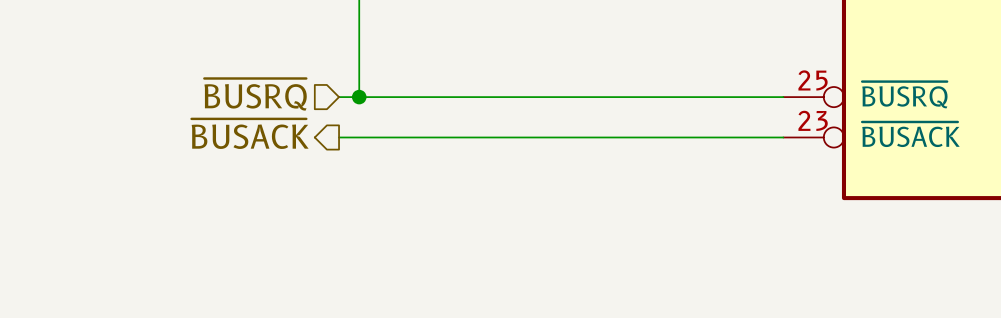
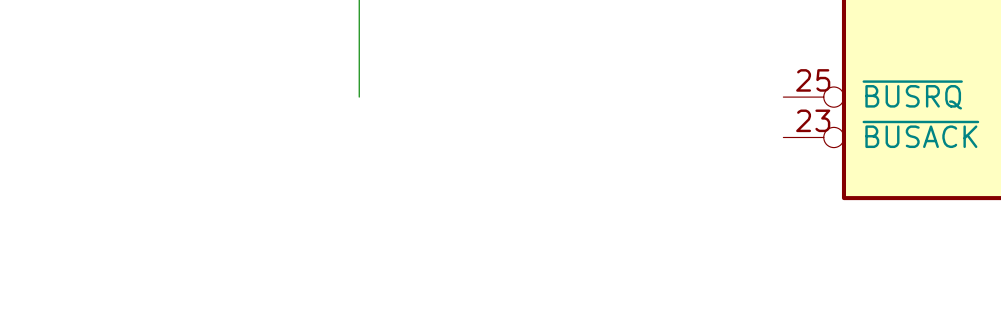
hierarchical label: ~{BUSRQ} (255, 94) -> none
wire: (339, 97) (783, 97) -> none
junction: (359, 97) -> none
hierarchical label: ~{BUSACK} (250, 133) -> none
wire: (339, 137) (783, 137) -> none

